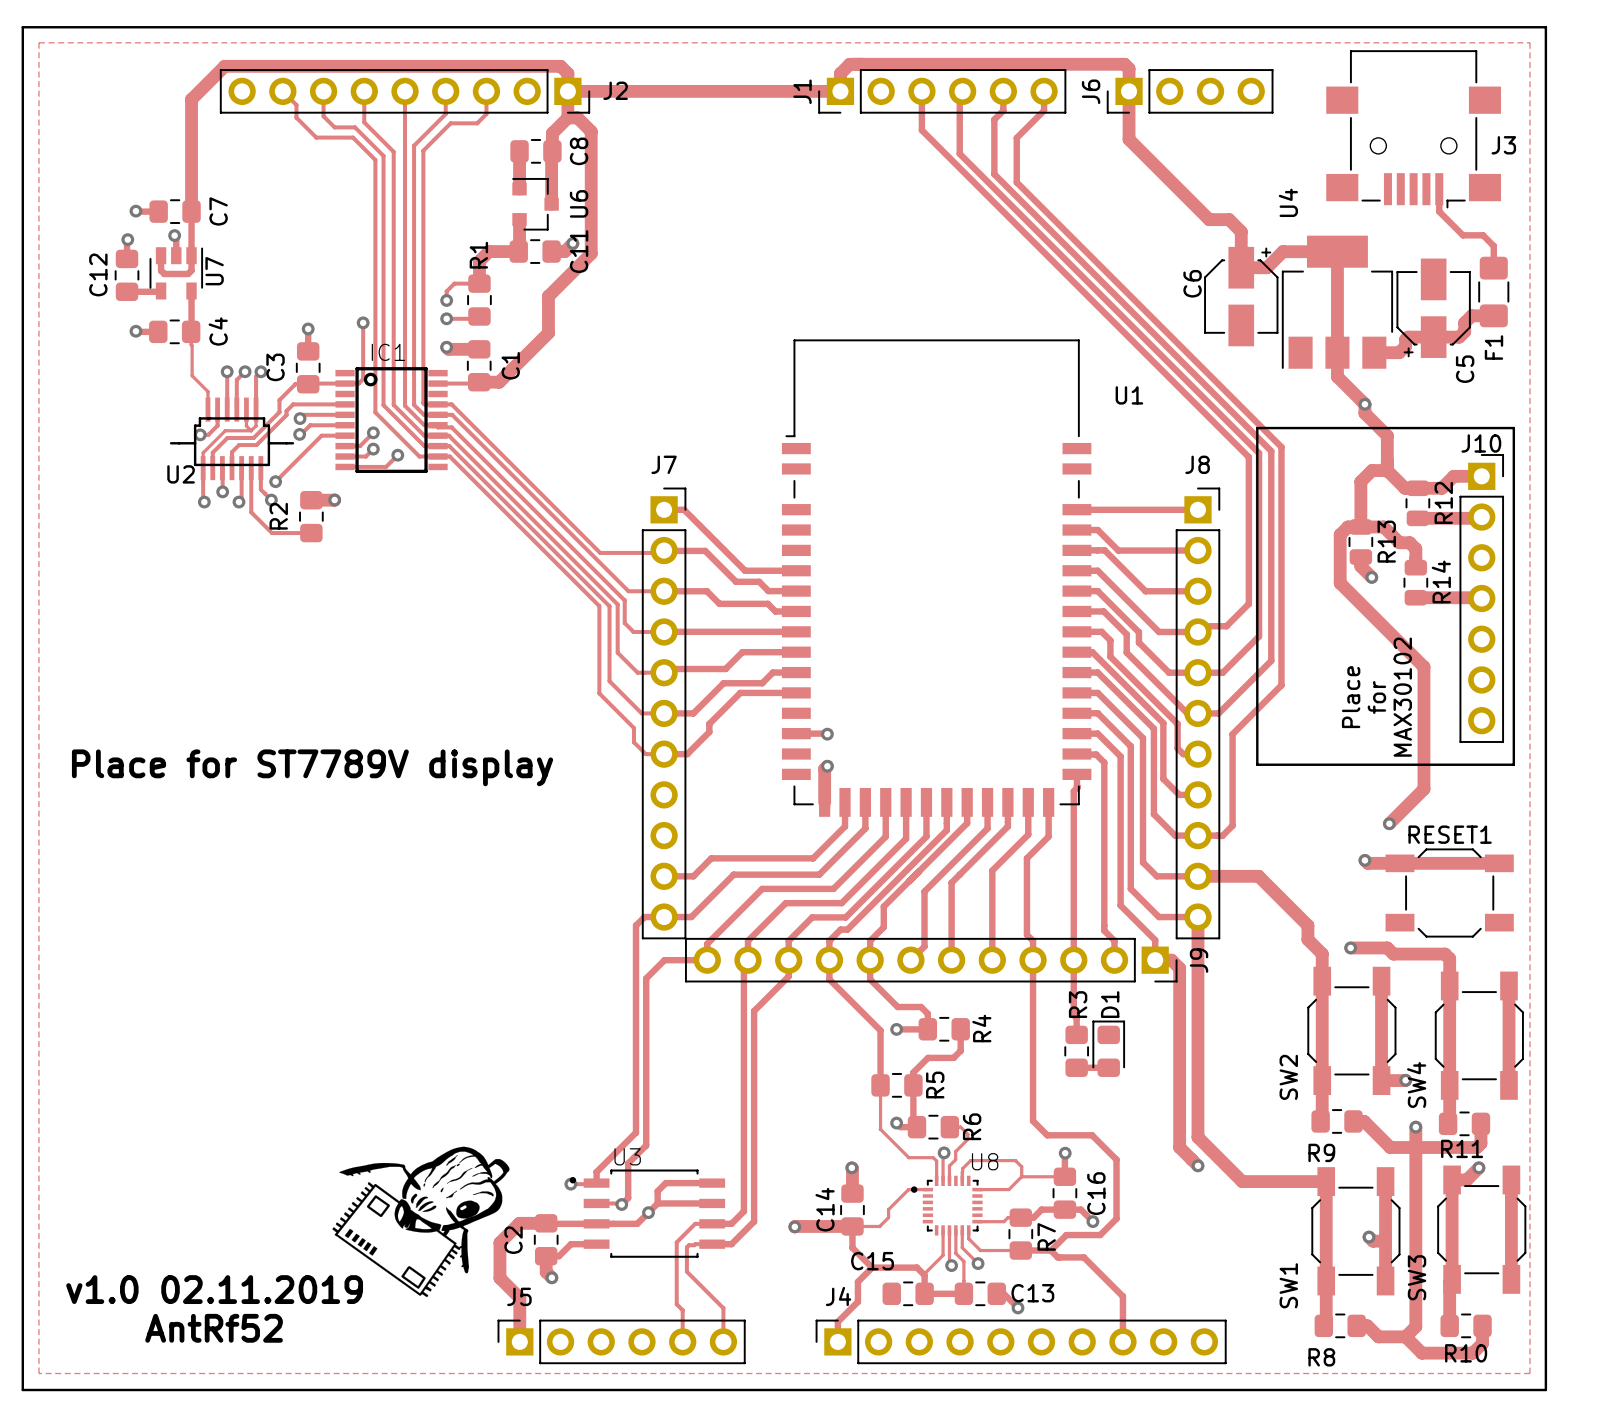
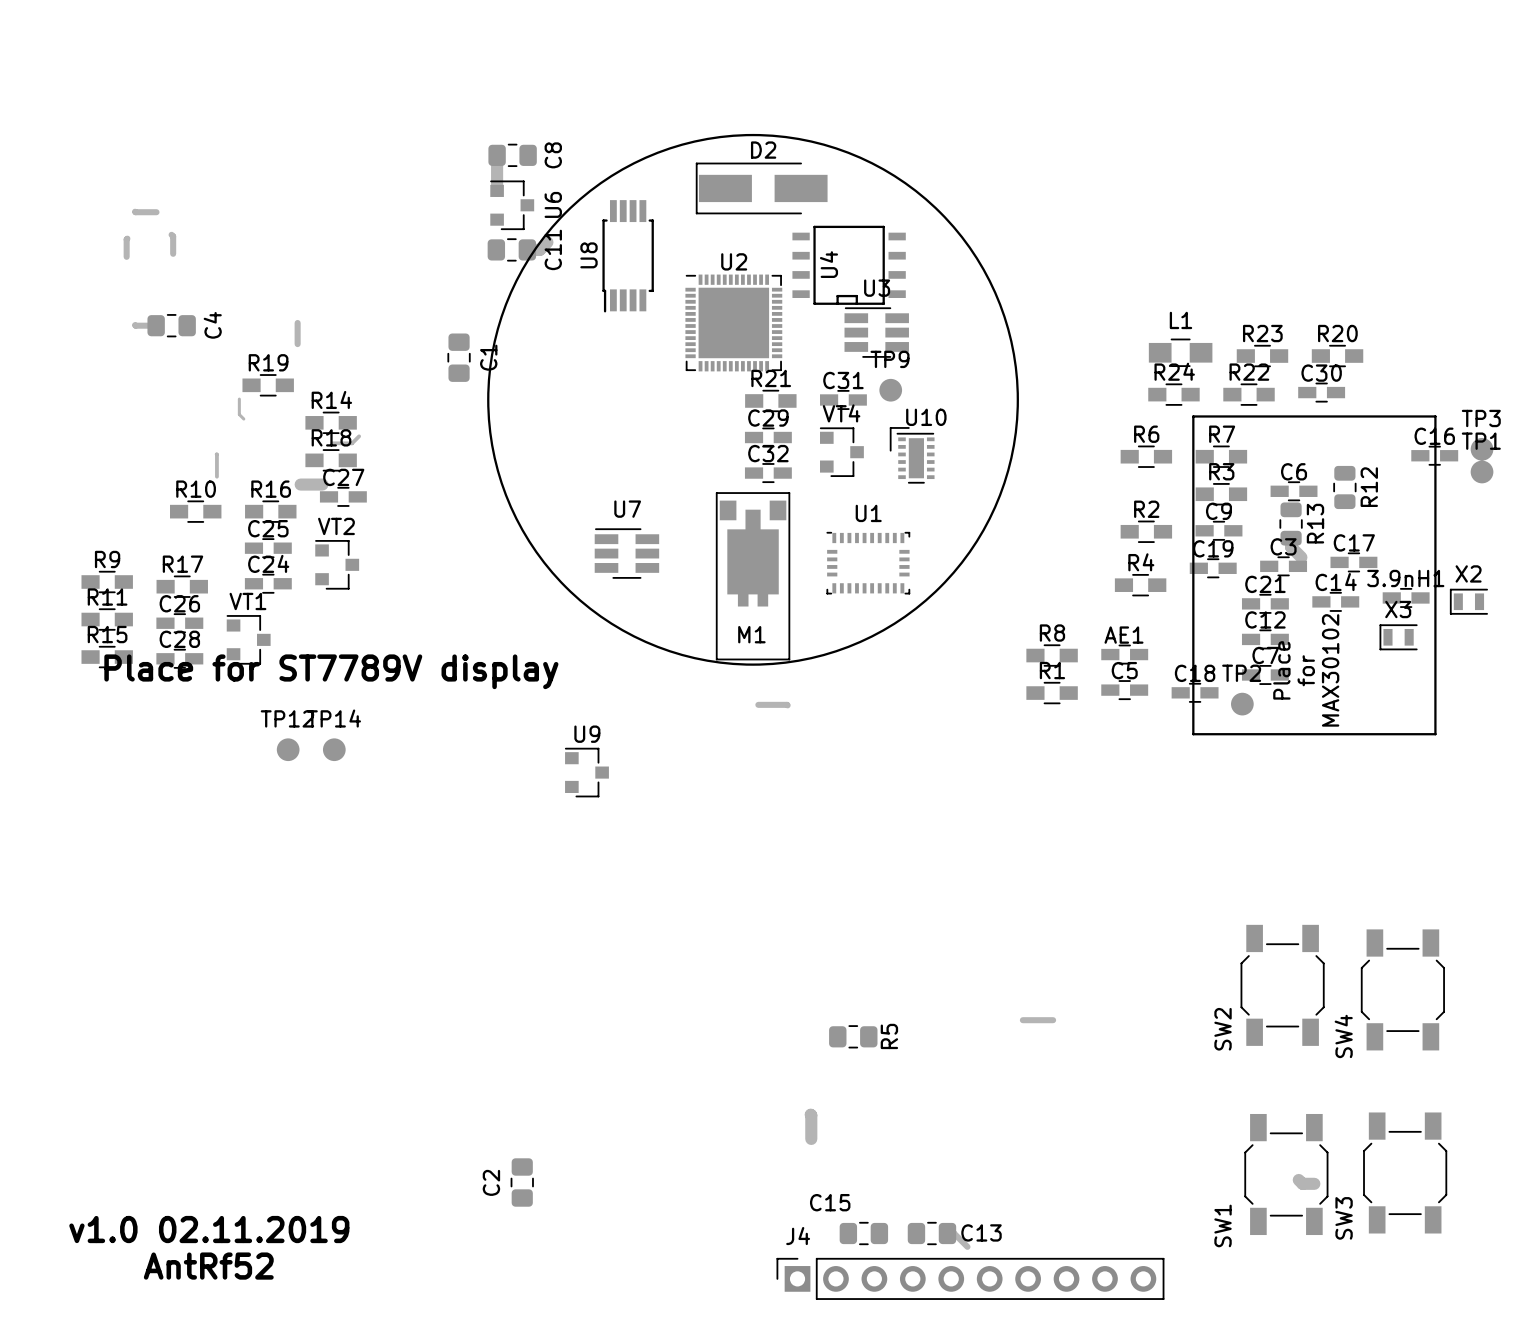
board edge: (22, 27) (22, 1390) (1545, 1390) (1545, 27) (22, 27) -> none
zone outline: (38, 42) (1529, 42) (1529, 1373) (38, 1373) (38, 42) -> none
track: (282, 91) (296, 105) (296, 117) (316, 137) (352, 137) (375, 159) (375, 412) (419, 456) (449, 456) (599, 606) (599, 693) (633, 728) (633, 742) (645, 754) (687, 754) (709, 732) (709, 723) (740, 692) (796, 692) -> none
track: (323, 91) (323, 116) (334, 127) (355, 127) (383, 155) (383, 405) (424, 446) (449, 446) (609, 606) (609, 681) (641, 713) (693, 713) (723, 683) (762, 683) (772, 672) (796, 672) -> none
track: (364, 91) (364, 122) (393, 151) (393, 404) (424, 435) (448, 435) (617, 604) (617, 652) (637, 672) (664, 672) (667, 669) (725, 669) (742, 652) (796, 652) -> none
track: (405, 91) (405, 405) (424, 425) (451, 427) (624, 600) (624, 623) (633, 631) (664, 631) -> none
J2: (405, 91) -> none
track: (445, 91) (445, 114) (414, 145) (414, 404) (423, 414) (452, 414) (628, 591) (706, 591) (719, 603) (767, 603) (775, 611) (796, 611) -> none
track: (486, 91) (486, 114) (477, 123) (450, 123) (423, 150) (423, 403) (451, 404) (600, 552) (705, 550) (736, 581) (759, 581) (768, 591) (796, 591) -> none
track: (567, 91) (840, 91) (840, 73) (849, 64) (1124, 64) (1129, 68) (1129, 139) (1209, 219) (1229, 219) (1241, 231) (1241, 267) (1266, 267) (1283, 251) -> none
track: (921, 91) (921, 130) (1248, 457) (1248, 603) (1226, 626) (1203, 626) (1197, 631) (1159, 631) (1097, 570) (1076, 570) -> none
J1: (942, 91) -> none
track: (962, 91) (959, 94) (959, 153) (1259, 453) (1259, 636) (1222, 672) (1169, 672) (1138, 642) (1138, 632) (1097, 591) (1076, 591) -> none
track: (1003, 91) (1003, 110) (994, 119) (994, 174) (1271, 451) (1271, 660) (1218, 713) (1187, 713) (1126, 652) (1126, 634) (1103, 611) (1076, 611) -> none
track: (1044, 91) (1044, 110) (1016, 137) (1016, 182) (1281, 447) (1281, 685) (1232, 734) (1232, 825) (1222, 835) (1175, 835) (1153, 814) (1153, 728) (1097, 672) (1076, 672) -> none
J6: (1190, 91) -> none
track: (567, 117) (567, 73) (560, 66) (224, 66) (191, 99) (191, 270) (188, 273) (164, 273) (161, 270) (161, 255) -> none
track: (567, 117) (552, 133) (552, 151) -> none
track: (567, 117) (577, 117) (591, 131) (591, 253) (548, 296) (548, 333) (499, 382) (438, 383) -> none
round board edge: none -> [487, 133, 1019, 666]
J3: (1413, 129) -> none
track: (551, 152) (551, 204) -> none
D2: none -> (761, 188)
track: (1439, 189) (1439, 211) (1462, 235) (1483, 235) (1493, 246) (1493, 268) -> none
C7 footprint: [149, 199, 201, 224] -> [1241, 664, 1289, 685]
U4 name position: U4 (1288, 202) -> U4 (828, 264)
via: (135, 211) -> none
C7 name position: C7 (218, 211) -> C7 (1265, 655)
track: (519, 219) (519, 250) (489, 251) (479, 261) (479, 283) (454, 283) (446, 291) (446, 300) -> none
via: (174, 235) -> none
U4 footprint: [1281, 235, 1394, 369] -> [792, 225, 906, 305]
via: (127, 239) -> none
via: (572, 243) -> none
C6 footprint: [1204, 246, 1279, 347] -> [1270, 481, 1318, 502]
U7 footprint: [149, 247, 204, 300] -> [594, 528, 660, 579]
C12 footprint: [114, 249, 140, 302] -> [1241, 629, 1289, 650]
track: (1283, 251) (1337, 251) (1337, 376) (1364, 404) (1364, 413) (1387, 435) (1387, 471) -> none
C5 footprint: [1396, 258, 1471, 358] -> [1101, 680, 1149, 701]
U7 name position: U7 (214, 271) -> U7 (627, 509)
C12 name position: C12 (98, 274) -> C12 (1265, 619)
R1 footprint: [467, 274, 492, 326] -> [1026, 681, 1078, 705]
C6 name position: C6 (1192, 283) -> C6 (1294, 471)
track: (161, 290) (127, 291) -> none
track: (191, 290) (192, 375) (207, 391) (207, 409) -> none
F1: (1493, 291) -> none
via: (446, 300) -> none
track: (1493, 315) (1471, 315) (1464, 322) (1464, 331) (1459, 337) (1408, 337) (1405, 339) (1405, 346) (1399, 352) (1374, 352) -> none
track: (479, 316) (477, 318) (446, 318) -> none
via: (446, 318) -> none
track: (363, 322) (363, 379) (358, 383) (295, 384) (279, 400) (279, 412) (253, 437) (227, 437) (212, 452) (212, 468) -> none
via: (363, 322) -> none
via: (308, 328) -> none
via: (135, 331) -> none
U1 footprint: [781, 339, 1092, 817] -> [826, 531, 911, 595]
C3 footprint: [295, 342, 321, 394] -> [1260, 556, 1308, 577]
track: (446, 347) (448, 349) (479, 349) -> none
via: (446, 347) -> none
L1: none -> (1180, 352)
R23: none -> (1262, 356)
R20: none -> (1337, 356)
C3 name position: C3 (275, 367) -> C3 (1283, 546)
C5 name position: C5 (1465, 369) -> C5 (1124, 670)
track: (227, 371) (227, 409) -> none
via: (227, 371) -> none
track: (245, 371) (236, 379) (236, 409) -> none
via: (245, 371) -> none
track: (260, 371) (256, 376) (256, 425) (251, 430) (225, 430) (203, 452) (204, 502) -> none
via: (260, 371) -> none
R19: none -> (268, 385)
U1 name position: U1 (1129, 395) -> U1 (868, 513)
U2 footprint: [169, 397, 295, 481] -> [685, 274, 783, 372]
TP9: none -> (890, 390)
C30: none -> (1321, 392)
track: (345, 404) (293, 404) (286, 411) (286, 415) (256, 445) (239, 445) (232, 452) (232, 468) -> none
R24: none -> (1173, 394)
R22: none -> (1249, 394)
via: (1364, 404) -> none
track: (217, 409) (217, 425) (208, 434) (200, 434) -> none
C31: none -> (843, 399)
R21: none -> (770, 400)
track: (345, 414) (303, 414) (300, 418) -> none
via: (300, 418) -> none
IC1: (391, 420) -> none
track: (345, 425) (310, 425) (299, 434) -> none
track: (373, 432) (360, 446) (345, 446) -> none
via: (373, 432) -> none
via: (200, 434) -> none
via: (299, 434) -> none
track: (345, 435) (321, 435) (275, 481) -> none
via: (373, 449) -> none
C29: none -> (768, 437)
track: (397, 455) (386, 466) (345, 466) -> none
via: (397, 455) -> none
TP3: none -> (1482, 449)
VT4: none -> (841, 452)
track: (241, 468) (241, 499) (238, 502) -> none
track: (251, 468) (251, 512) (272, 533) (311, 533) -> none
track: (260, 468) (260, 489) (271, 500) -> none
U10: none -> (912, 455)
U2 name position: U2 (181, 474) -> U2 (734, 261)
R18: none -> (331, 460)
track: (1481, 476) (1453, 476) (1441, 488) (1405, 488) (1387, 470) (1371, 470) (1360, 481) (1360, 526) -> none
via: (275, 481) -> none
TP1: none -> (1482, 472)
C32: none -> (768, 473)
R2 footprint: [299, 490, 324, 543] -> [1120, 520, 1173, 543]
via: (222, 491) -> none
via: (271, 500) -> none
via: (334, 500) -> none
via: (204, 502) -> none
via: (238, 502) -> none
track: (664, 509) (684, 509) (745, 570) (796, 570) -> none
track: (1077, 509) (1197, 509) -> none
C27: none -> (343, 496)
R2 name position: R2 (278, 516) -> R2 (1146, 509)
track: (1481, 517) (1417, 518) -> none
R16: none -> (270, 511)
track: (1076, 530) (1097, 530) (1118, 550) (1197, 550) -> none
C9: none -> (1218, 530)
track: (1076, 550) (1104, 550) (1145, 591) (1197, 591) -> none
R14 footprint: [1403, 559, 1429, 606] -> [305, 411, 357, 435]
C25: none -> (268, 548)
track: (1415, 567) (1415, 548) (1409, 542) (1399, 542) (1383, 526) (1348, 526) (1340, 534) (1340, 583) (1423, 666) (1423, 789) (1389, 823) -> none
via: (1371, 577) -> none
R14 name position: R14 (1441, 581) -> R14 (331, 399)
C17: none -> (1353, 562)
VT2: none -> (337, 564)
C19: none -> (1213, 568)
M1: none -> (753, 576)
track: (1415, 597) (1481, 598) -> none
J10: (1481, 598) -> none
C24: none -> (268, 583)
R17: none -> (182, 586)
3.9nH1: none -> (1406, 597)
X2: none -> (1468, 601)
C21: none -> (1265, 603)
track: (664, 631) (796, 631) -> none
track: (1076, 631) (1101, 631) (1110, 640) (1110, 656) (1177, 723) (1177, 748) (1183, 754) (1197, 754) -> none
C26: none -> (179, 623)
track: (1076, 652) (1092, 652) (1163, 723) (1163, 778) (1179, 794) (1197, 794) -> none
X3: none -> (1398, 637)
VT1: none -> (248, 639)
AE1: none -> (1124, 654)
R15: none -> (107, 657)
C28: none -> (179, 658)
track: (1076, 692) (1097, 692) (1143, 738) (1143, 862) (1156, 876) (1258, 876) (1307, 925) (1307, 939) (1322, 953) (1322, 1119) (1320, 1121) -> none
J7: (664, 713) -> none
track: (1076, 713) (1097, 713) (1130, 746) (1130, 888) (1158, 917) (1197, 917) (1197, 1137) (1242, 1181) (1326, 1181) (1326, 1323) (1323, 1325) -> none
J8: (1197, 713) -> none
C18: none -> (1195, 692)
TP2: none -> (1242, 704)
track: (1076, 733) (1097, 733) (1120, 756) (1120, 905) (1155, 940) (1155, 960) (1171, 960) (1179, 968) (1179, 1147) (1197, 1165) -> none
via: (827, 734) -> none
track: (1076, 753) (1096, 754) (1104, 762) (1104, 930) (1114, 940) (1114, 960) -> none
track: (827, 766) (824, 768) (824, 802) -> none
via: (827, 766) -> none
text position: Place for ST7789V display (312, 767) -> Place for ST7789V display (331, 671)
track: (1076, 774) (1077, 787) (1073, 791) (1073, 1015) (1076, 1018) (1076, 1034) -> none
TP12: none -> (288, 749)
TP14: none -> (334, 749)
track: (845, 802) (845, 826) (813, 858) (711, 858) (693, 876) (664, 876) -> none
track: (865, 802) (865, 828) (819, 874) (733, 874) (691, 917) (644, 917) (636, 925) (636, 1132) (596, 1172) (595, 1184) (570, 1184) -> none
track: (885, 802) (885, 836) (833, 888) (762, 888) (707, 943) (707, 960) (664, 960) (646, 978) (646, 1145) (628, 1163) (628, 1198) (621, 1204) (596, 1203) -> none
track: (906, 802) (906, 838) (841, 903) (785, 903) (747, 940) (747, 960) (743, 964) (743, 1211) (731, 1223) (695, 1223) (676, 1242) (676, 1304) (682, 1310) (682, 1341) -> none
track: (926, 802) (926, 836) (845, 917) (812, 917) (788, 940) (788, 976) (754, 1011) (754, 1221) (731, 1244) (695, 1244) (686, 1247) (686, 1271) (723, 1308) (723, 1341) -> none
track: (946, 802) (946, 830) (847, 929) (840, 929) (829, 940) (829, 979) (880, 1030) (880, 1128) -> none
track: (967, 802) (967, 823) (883, 906) (883, 927) (870, 940) (870, 979) (897, 1007) (921, 1007) (927, 1013) (927, 1029) -> none
track: (987, 802) (987, 828) (924, 891) (924, 946) (910, 960) -> none
track: (1007, 802) (1007, 826) (951, 882) (951, 960) -> none
track: (1028, 802) (1028, 834) (992, 870) (992, 960) -> none
track: (1048, 802) (1048, 836) (1026, 858) (1026, 934) (1033, 940) (1033, 1121) (1047, 1135) (1092, 1135) (1116, 1159) (1116, 1218) (1100, 1235) (1066, 1235) (1050, 1250) -> none
U9: none -> (586, 772)
via: (1389, 823) -> none
track: (1364, 860) (1367, 863) (1499, 863) -> none
via: (1364, 860) -> none
RESET1: (1449, 893) -> none
track: (1350, 947) (1387, 947) (1393, 954) (1445, 954) (1449, 958) (1449, 1122) (1448, 1123) -> none
via: (1350, 947) -> none
J9: (931, 960) -> none
track: (1381, 981) (1381, 1080) (1405, 1080) -> none
track: (1509, 985) (1509, 1085) -> none
R4 footprint: [918, 1016, 970, 1042] -> [1114, 573, 1167, 597]
R3 footprint: [1064, 1025, 1090, 1077] -> [1195, 483, 1248, 506]
R4 name position: R4 (981, 1028) -> R4 (1141, 562)
track: (896, 1029) (927, 1029) -> none
via: (896, 1029) -> none
track: (960, 1029) (960, 1050) (953, 1057) (928, 1057) (913, 1072) (913, 1123) (916, 1127) (900, 1127) (896, 1123) -> none
D1: (1108, 1048) -> none
via: (1405, 1080) -> none
R9 footprint: [1311, 1109, 1363, 1134] -> [81, 570, 133, 594]
R11 footprint: [1438, 1111, 1491, 1137] -> [81, 608, 133, 631]
R6 footprint: [907, 1114, 960, 1140] -> [1120, 445, 1173, 468]
track: (1353, 1121) (1364, 1121) (1390, 1147) (1476, 1147) (1480, 1143) (1480, 1123) -> none
via: (896, 1123) -> none
R6 name position: R6 (972, 1126) -> R6 (1146, 434)
track: (949, 1127) (960, 1127) (967, 1134) (967, 1139) (955, 1151) (955, 1159) (949, 1165) (949, 1180) -> none
track: (1415, 1127) (1415, 1326) (1405, 1336) -> none
via: (1415, 1127) -> none
track: (880, 1129) (908, 1157) (933, 1157) (936, 1161) (936, 1180) -> none
drawing: [332, 1146, 510, 1298] -> none
R11 name position: R11 (1462, 1148) -> R11 (107, 597)
track: (944, 1152) (943, 1180) -> none
via: (944, 1152) -> none
R9 name position: R9 (1321, 1152) -> R9 (107, 559)
track: (1065, 1153) (1064, 1176) (1021, 1176) -> none
via: (1065, 1153) -> none
U8 name position: U8 (985, 1161) -> U8 (588, 255)
via: (1197, 1165) -> none
via: (851, 1167) -> none
C16 footprint: [1052, 1167, 1078, 1219] -> [1411, 445, 1459, 466]
track: (1478, 1167) (1466, 1179) (1452, 1179) (1452, 1279) (1449, 1281) (1449, 1325) -> none
via: (1478, 1167) -> none
U3 footprint: [569, 1169, 726, 1258] -> [844, 307, 909, 358]
U8 footprint: [910, 1175, 983, 1236] -> [602, 200, 654, 313]
track: (1021, 1176) (1008, 1189) (977, 1189) -> none
track: (1021, 1176) (1021, 1166) (1015, 1160) (970, 1160) (962, 1168) (962, 1180) -> none
track: (1511, 1179) (1511, 1279) -> none
track: (1385, 1181) (1385, 1280) -> none
track: (712, 1183) (665, 1183) (657, 1191) (657, 1203) -> none
via: (570, 1184) -> none
C14 footprint: [840, 1184, 865, 1236] -> [1312, 591, 1360, 612]
track: (927, 1189) (908, 1189) (888, 1209) (888, 1217) (879, 1226) (852, 1226) -> none
C16 name position: C16 (1096, 1193) -> C16 (1434, 436)
track: (657, 1203) (712, 1203) -> none
track: (657, 1203) (637, 1223) (519, 1223) (499, 1242) (499, 1278) (519, 1298) (519, 1341) -> none
via: (621, 1204) -> none
R7 footprint: [1008, 1208, 1034, 1260] -> [1195, 445, 1248, 468]
C14 name position: C14 (825, 1209) -> C14 (1336, 582)
via: (648, 1212) -> none
track: (977, 1221) (1003, 1221) (1007, 1217) (1033, 1217) (1041, 1209) (1080, 1209) (1092, 1221) -> none
via: (1092, 1221) -> none
via: (794, 1226) -> none
track: (852, 1226) (852, 1247) (872, 1267) -> none
track: (852, 1226) (794, 1226) -> none
track: (943, 1230) (943, 1255) (924, 1273) (924, 1293) -> none
track: (949, 1230) (949, 1263) (951, 1265) -> none
track: (955, 1230) (955, 1253) (963, 1261) (963, 1293) (924, 1293) -> none
track: (962, 1230) (962, 1247) (978, 1263) -> none
track: (968, 1230) (968, 1238) (980, 1250) (1050, 1250) -> none
R7 name position: R7 (1046, 1236) -> R7 (1222, 434)
via: (1369, 1237) -> none
track: (596, 1244) (571, 1244) (559, 1256) (546, 1256) (546, 1272) (551, 1277) -> none
track: (1050, 1250) (1057, 1257) (1083, 1257) (1122, 1296) (1122, 1341) -> none
via: (978, 1263) -> none
via: (951, 1265) -> none
track: (872, 1267) (916, 1267) (924, 1275) (924, 1293) -> none
track: (872, 1267) (857, 1281) (857, 1301) (837, 1321) (837, 1341) -> none
via: (551, 1277) -> none
via: (1017, 1307) -> none
R8 footprint: [1314, 1313, 1366, 1339] -> [1026, 644, 1078, 667]
R10 footprint: [1440, 1313, 1492, 1339] -> [170, 500, 222, 523]
track: (1356, 1325) (1367, 1325) (1378, 1336) (1405, 1336) -> none
track: (1482, 1325) (1482, 1343) (1472, 1353) (1421, 1353) (1405, 1336) -> none
J5: (621, 1341) -> none
R10 name position: R10 (1466, 1353) -> R10 (196, 489)
R8 name position: R8 (1321, 1357) -> R8 (1052, 633)

